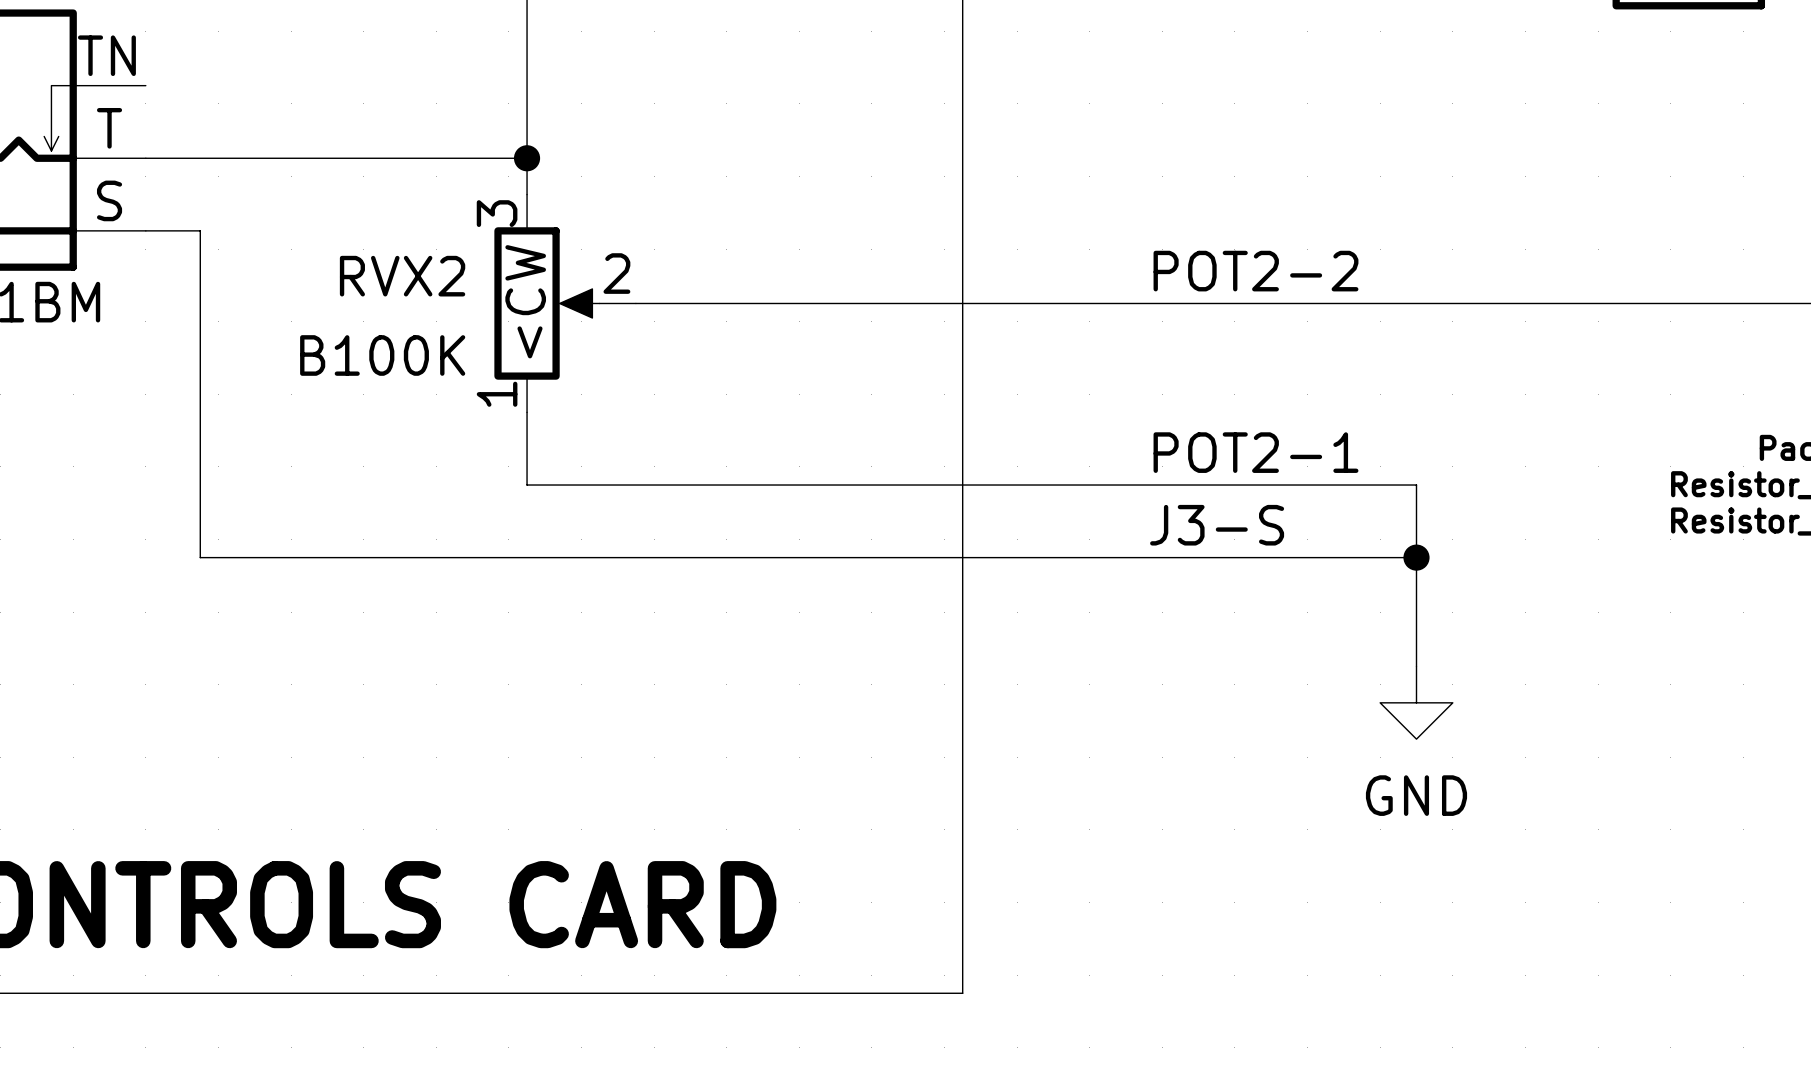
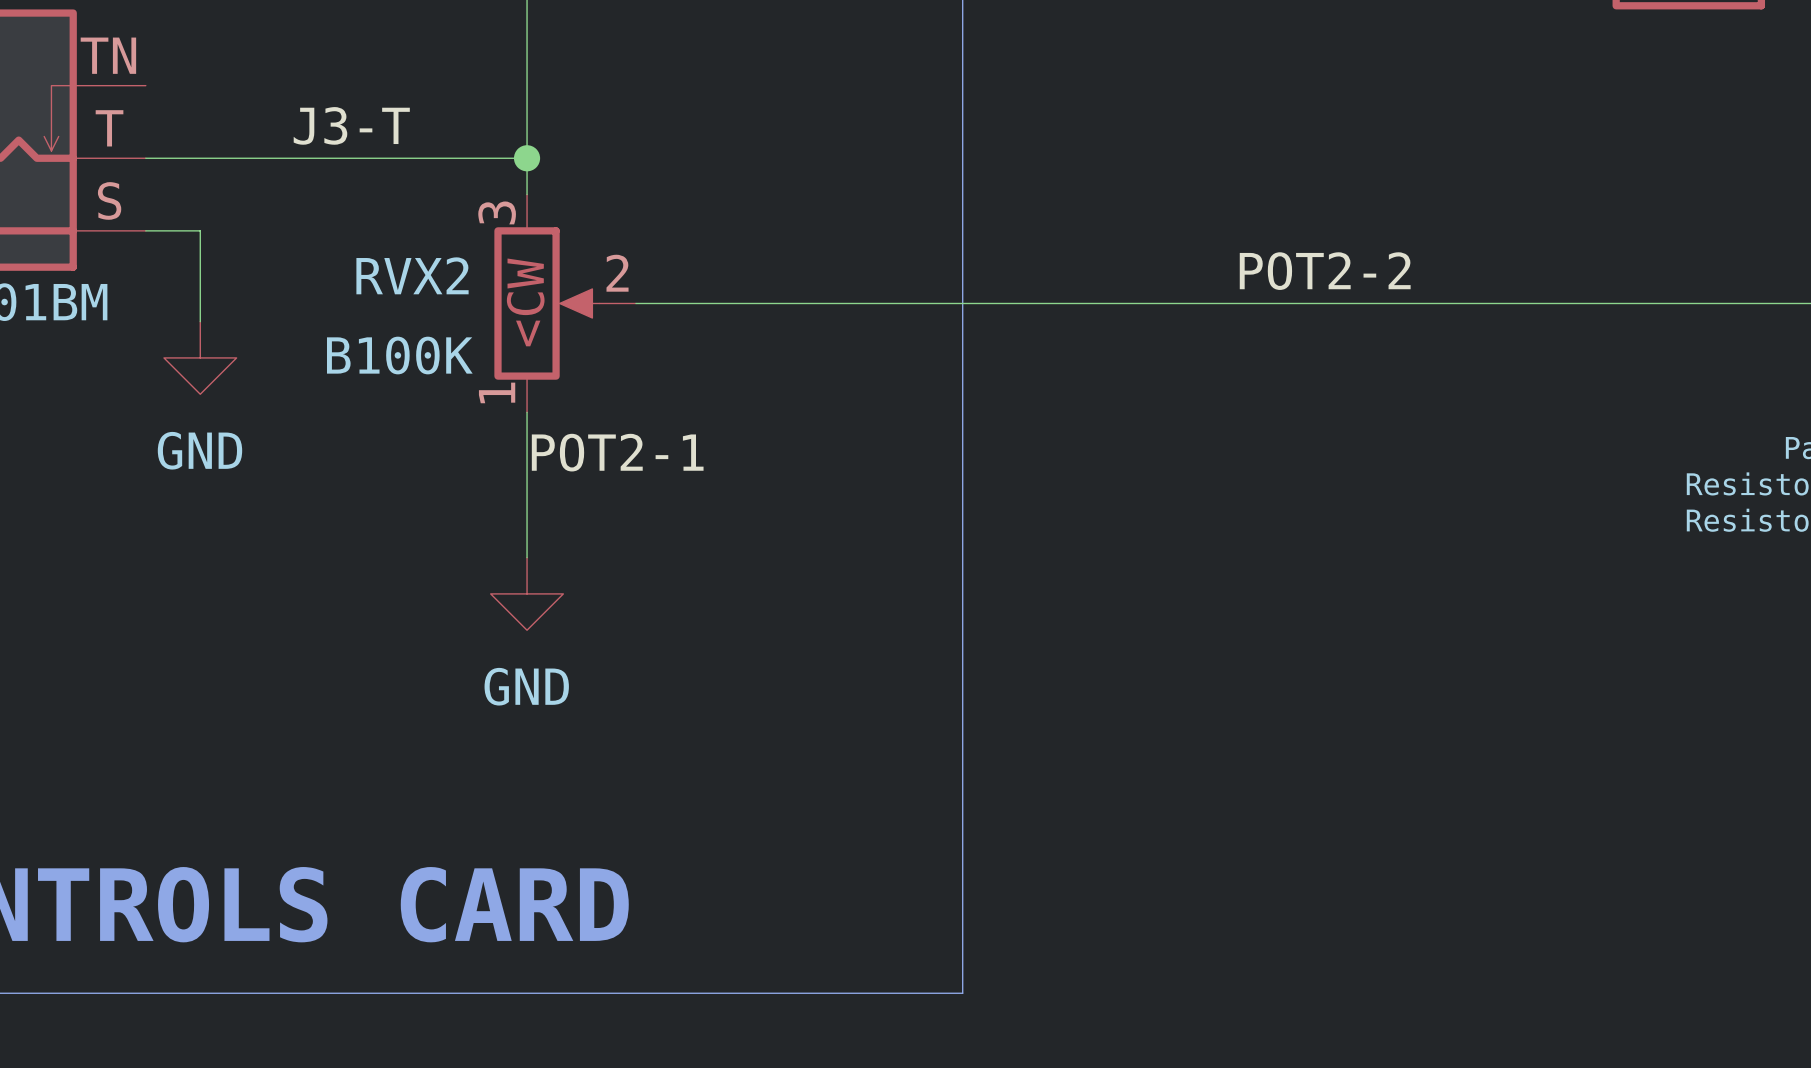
label: none -> J3-T (351, 125)
label position: POT2-2 (1255, 271) -> POT2-2 (1325, 271)
wire: (200, 321) (200, 557) (1416, 557) -> none
power symbol: none -> GND (200, 357)
label position: POT2-1 (1255, 452) -> POT2-1 (617, 452)
wire: (527, 485) (1416, 485) (1416, 666) -> (527, 485) (527, 557)
label: J3-S (1217, 525) -> none
junction: (1416, 557) -> none
power symbol: none -> GND (527, 593)
power symbol: GND (1416, 702) -> none

